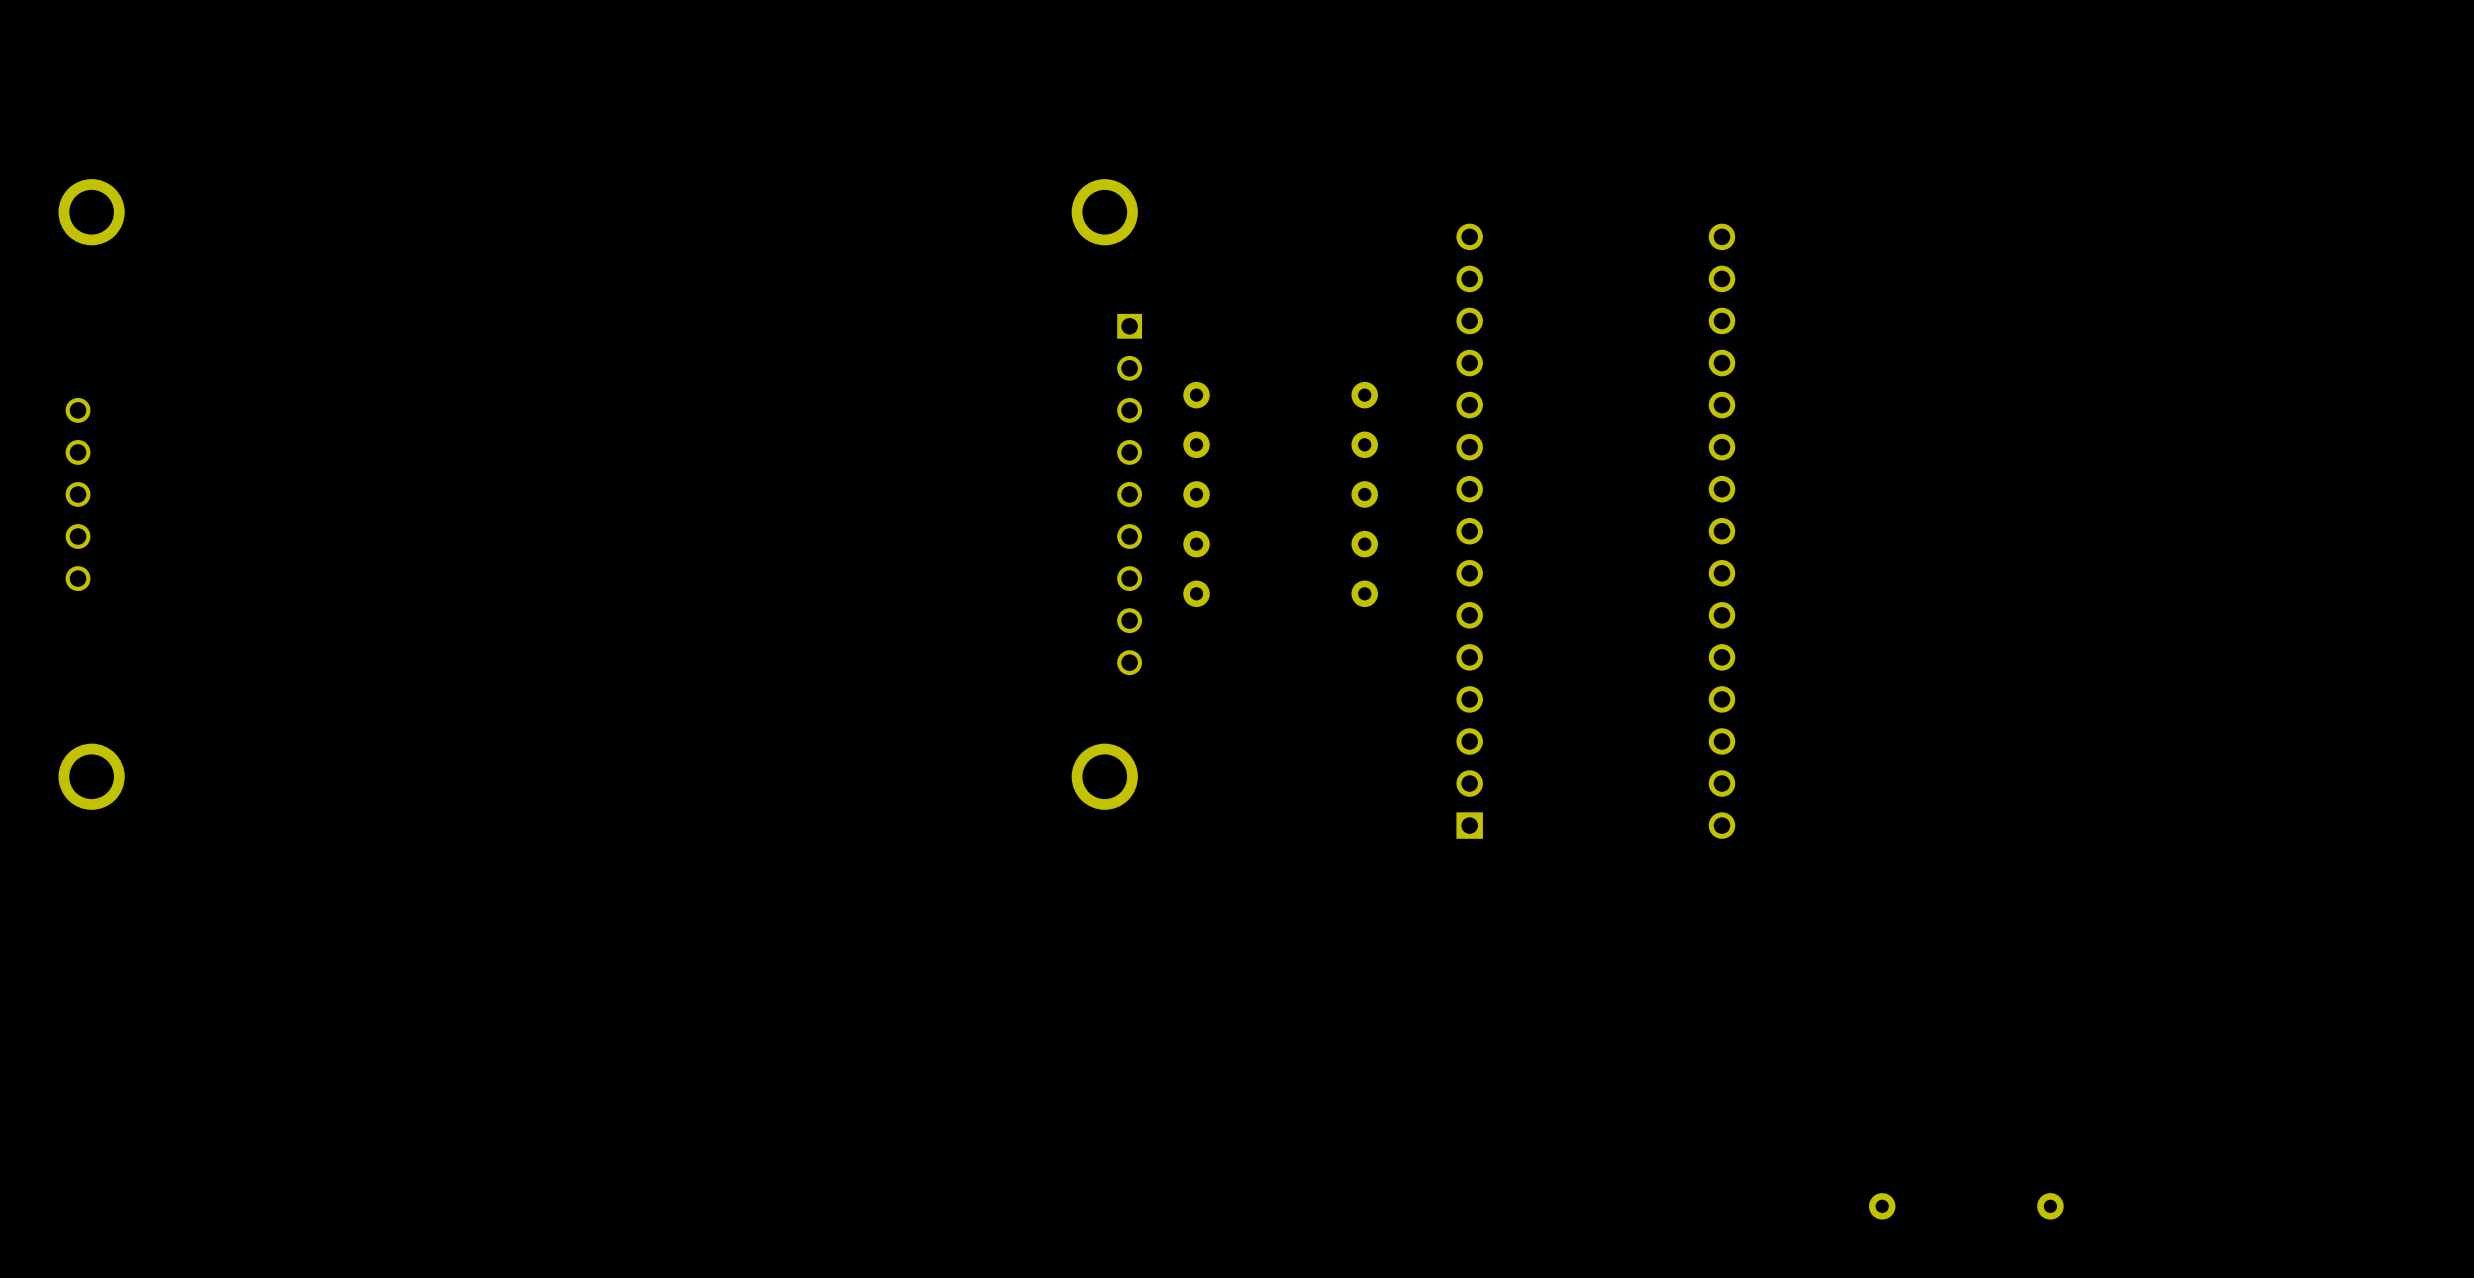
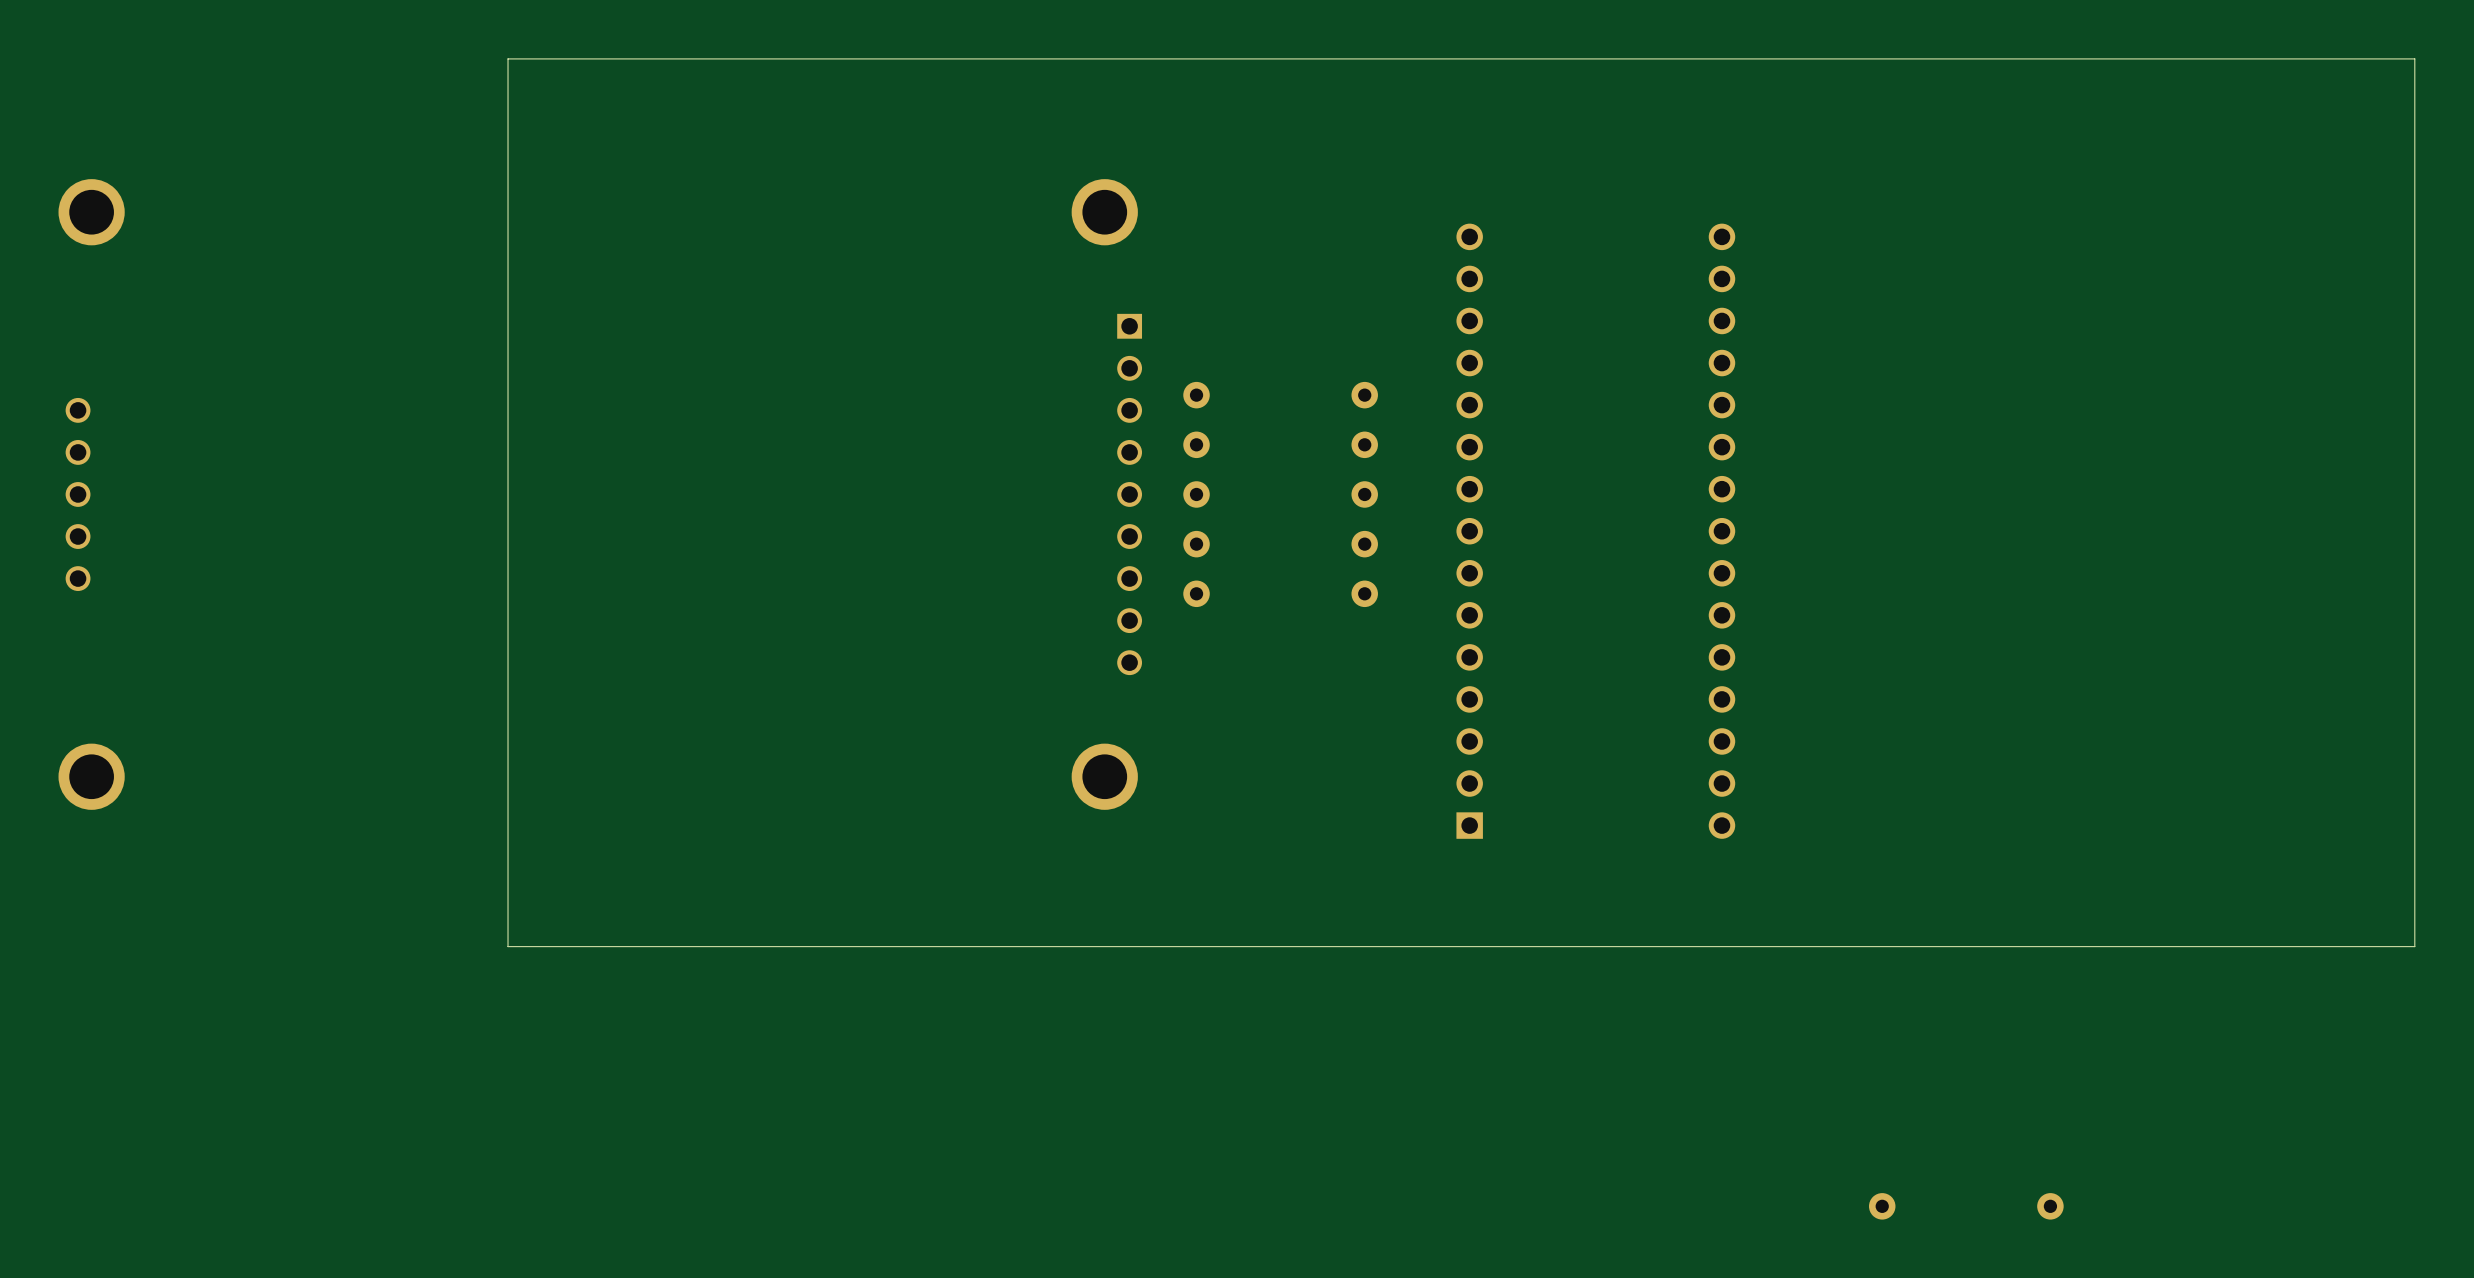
board edge: none -> (2414, 58) (508, 58) (508, 946) (2414, 946) (2414, 58)

